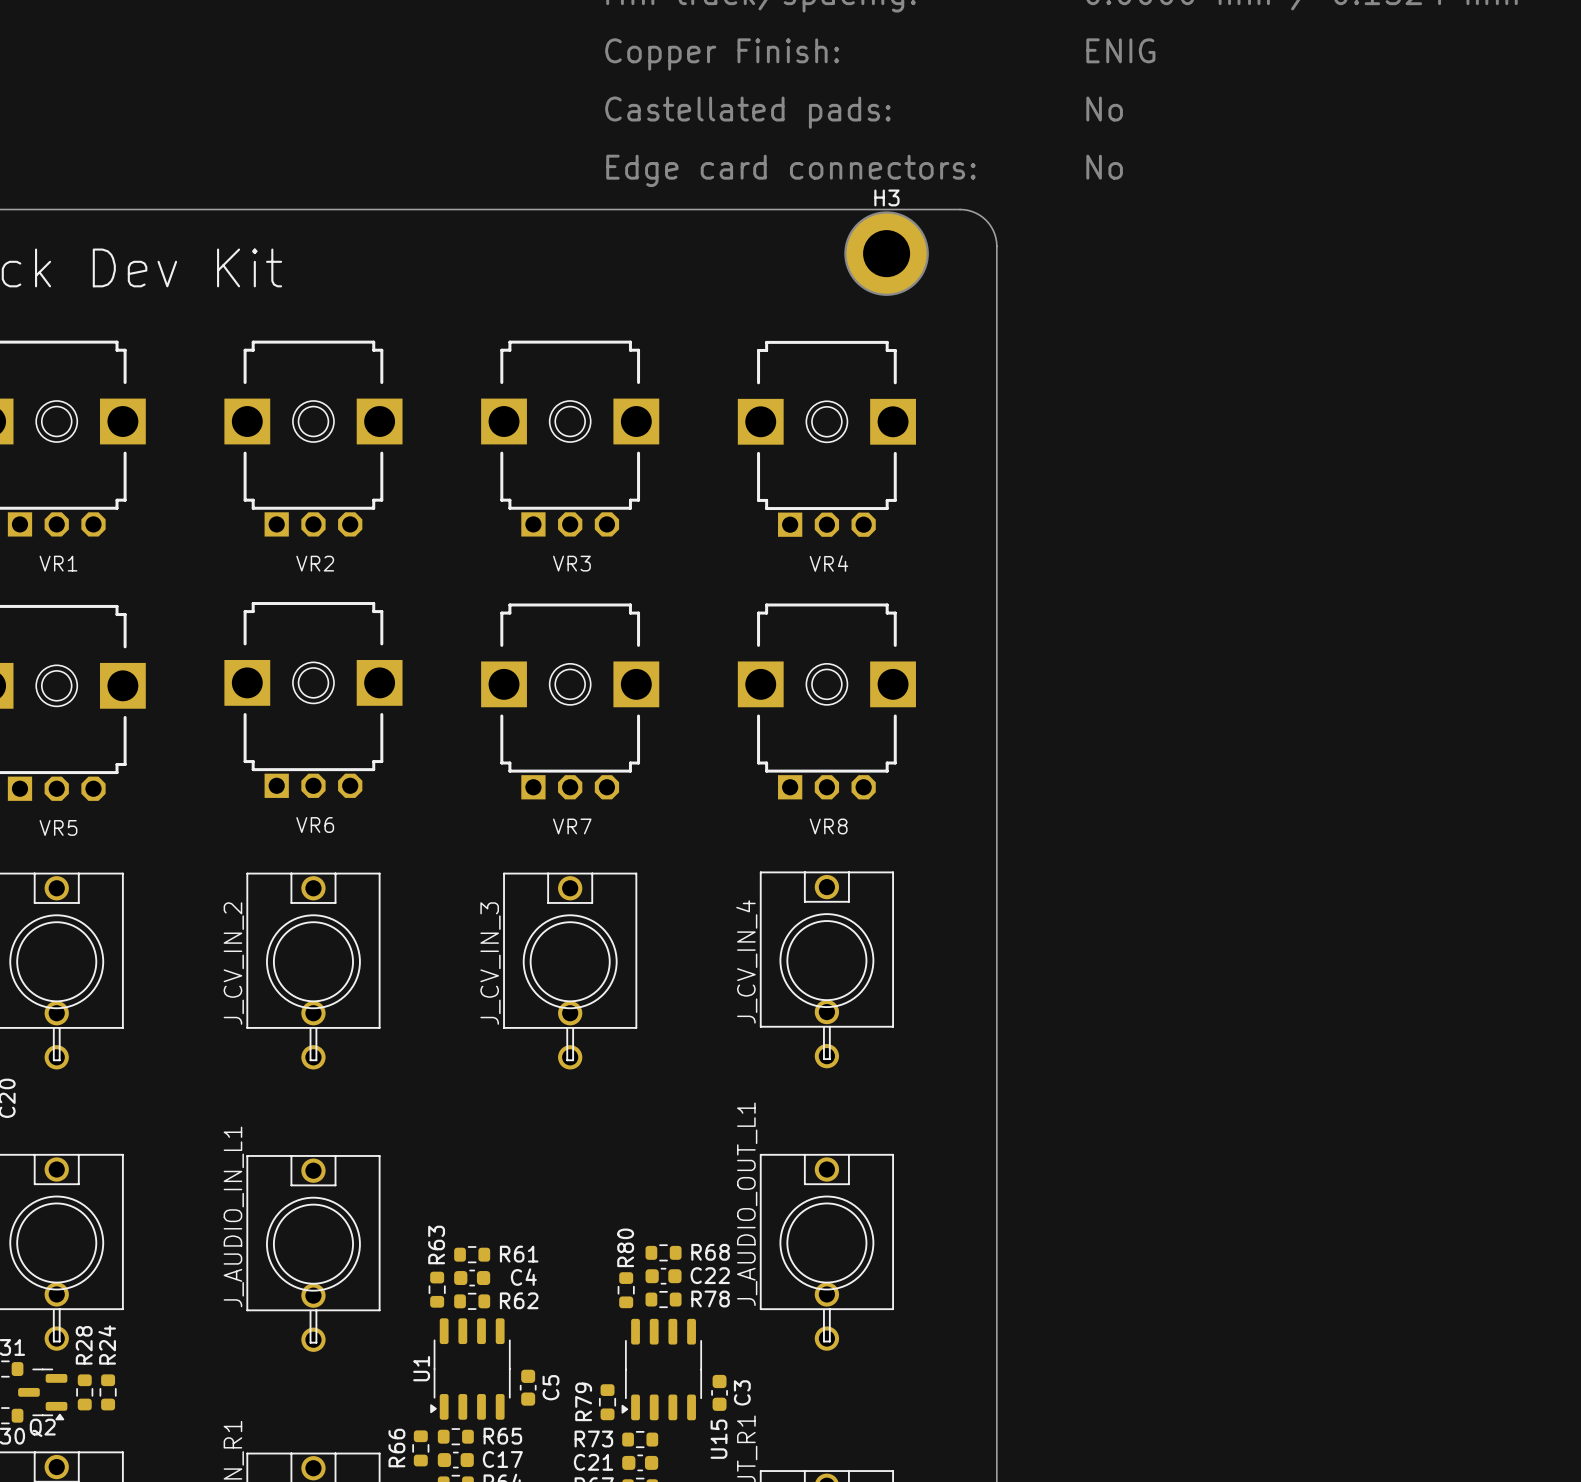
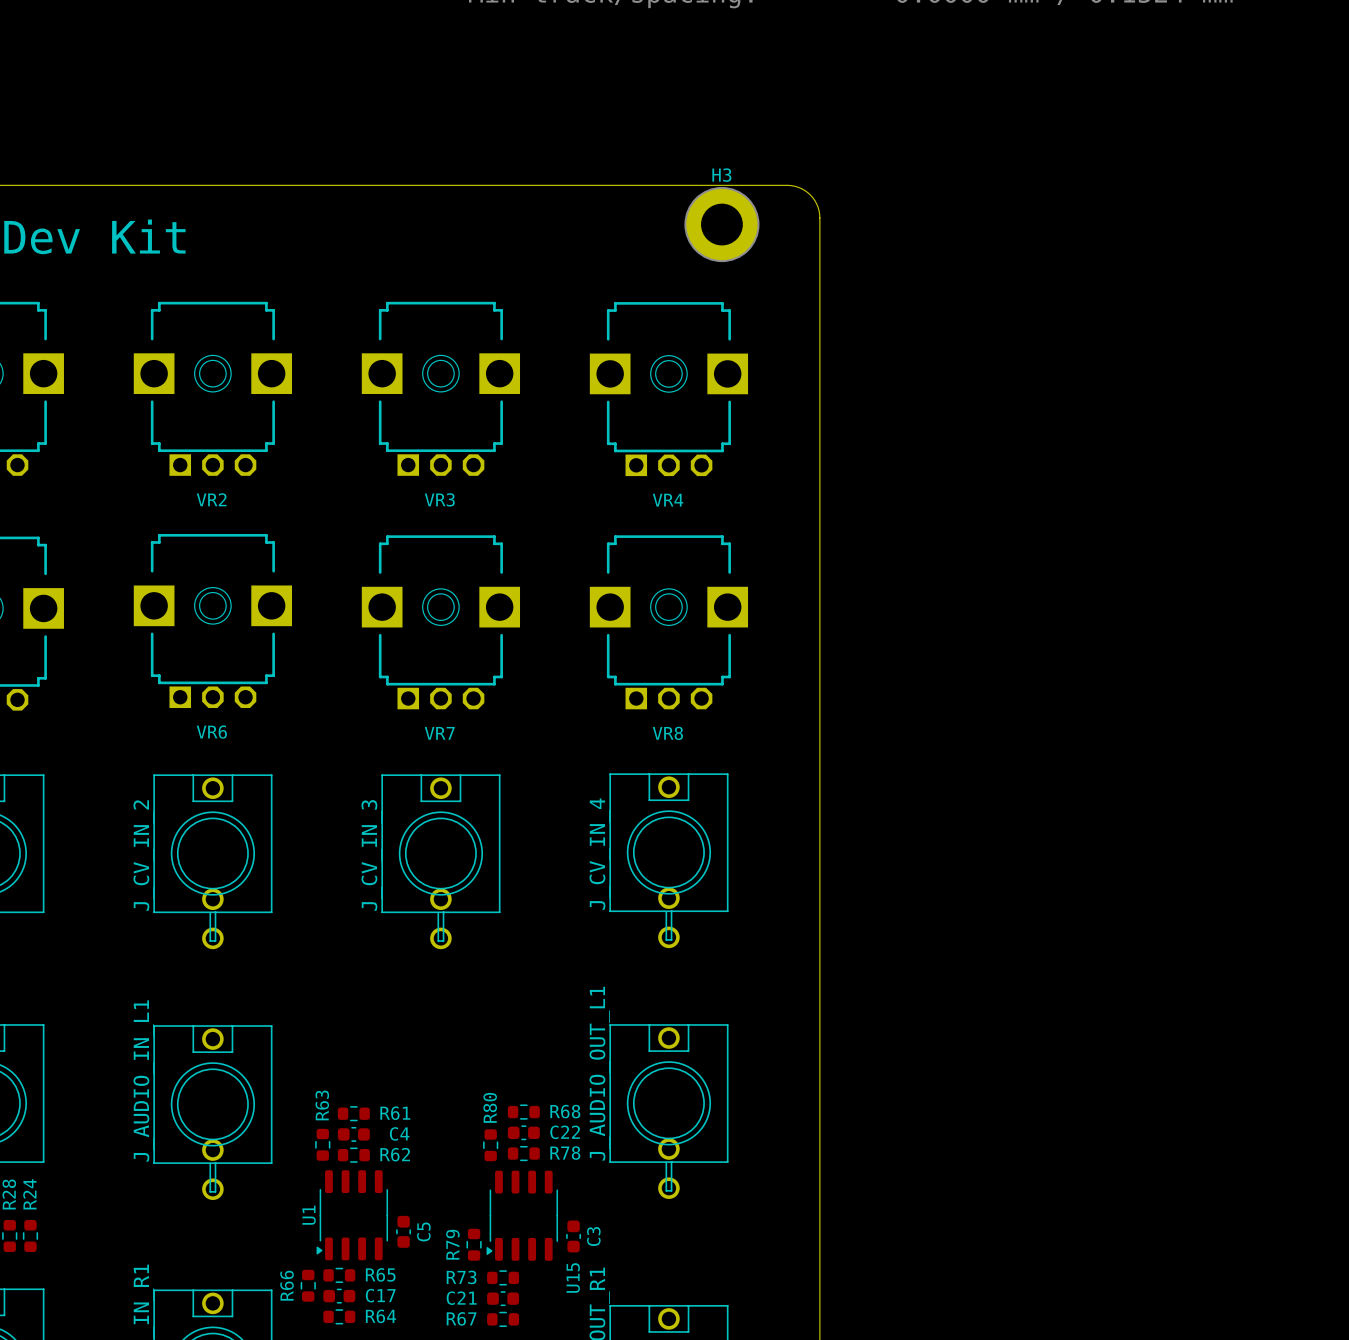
text: ENIG (1120, 50) -> none
text: Copper Finish: (722, 54) -> none
text: No (1104, 109) -> none
text: Castellated pads: (747, 112) -> none
text: No (1104, 167) -> none
text: Edge card connectors: (790, 170) -> none

